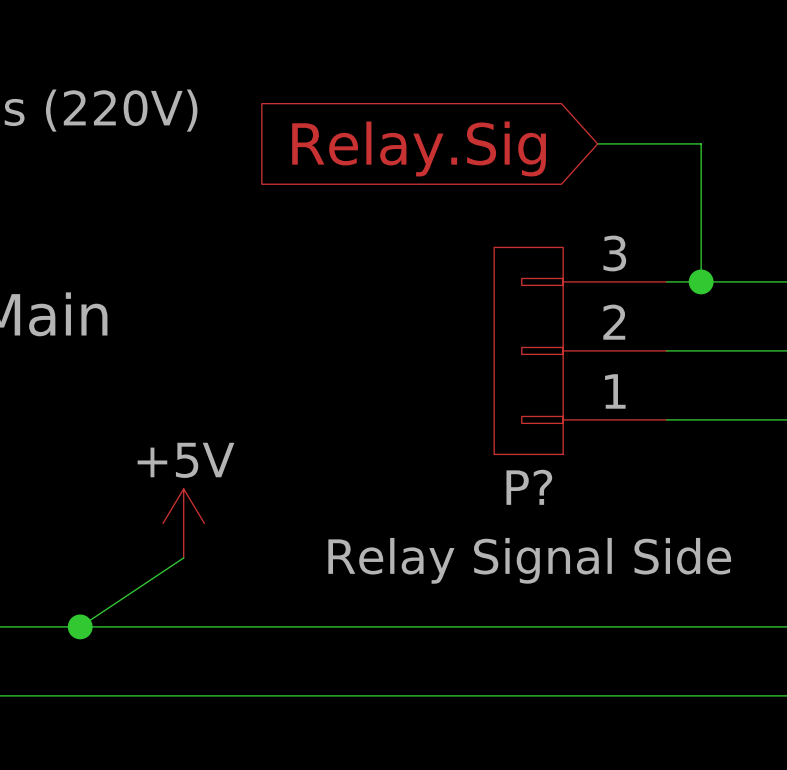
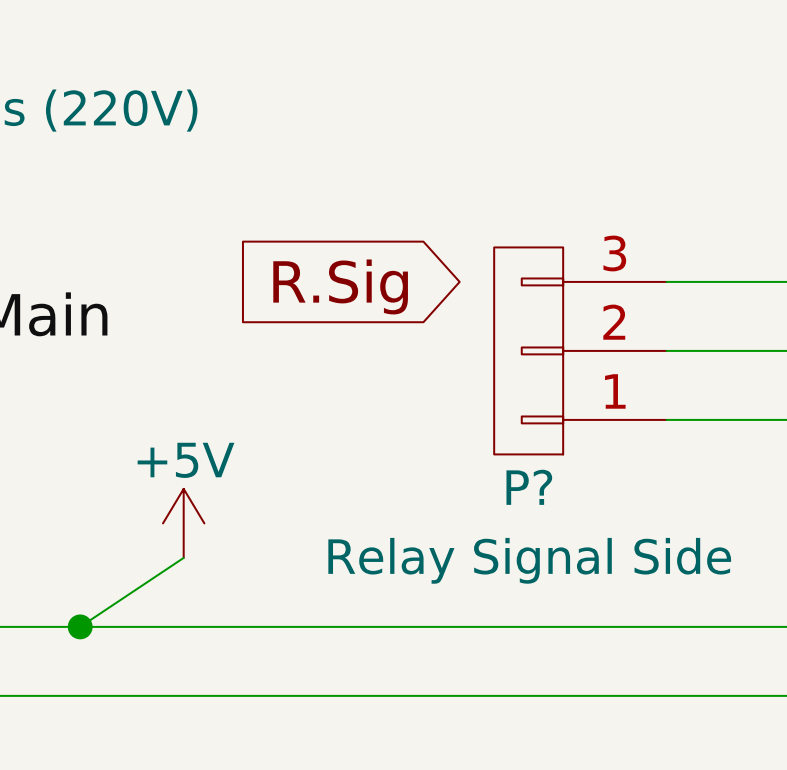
wire: (597, 143) (701, 143) (701, 281) -> none
global label: Relay.Sig (419, 148) -> none
junction: (701, 281) -> none
global label: none -> R.Sig (340, 286)

